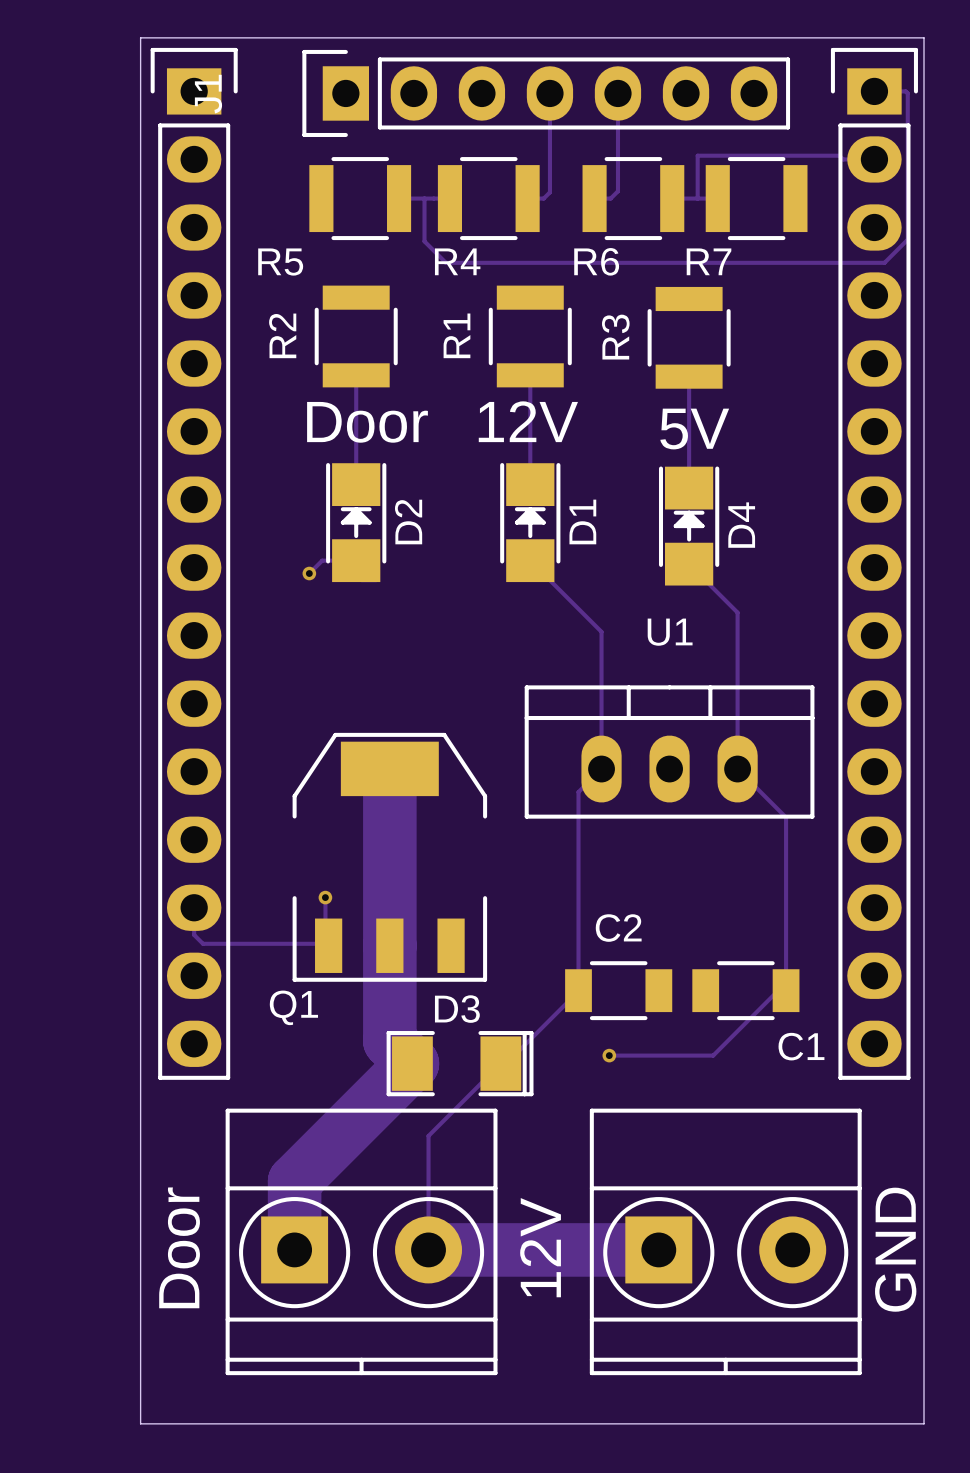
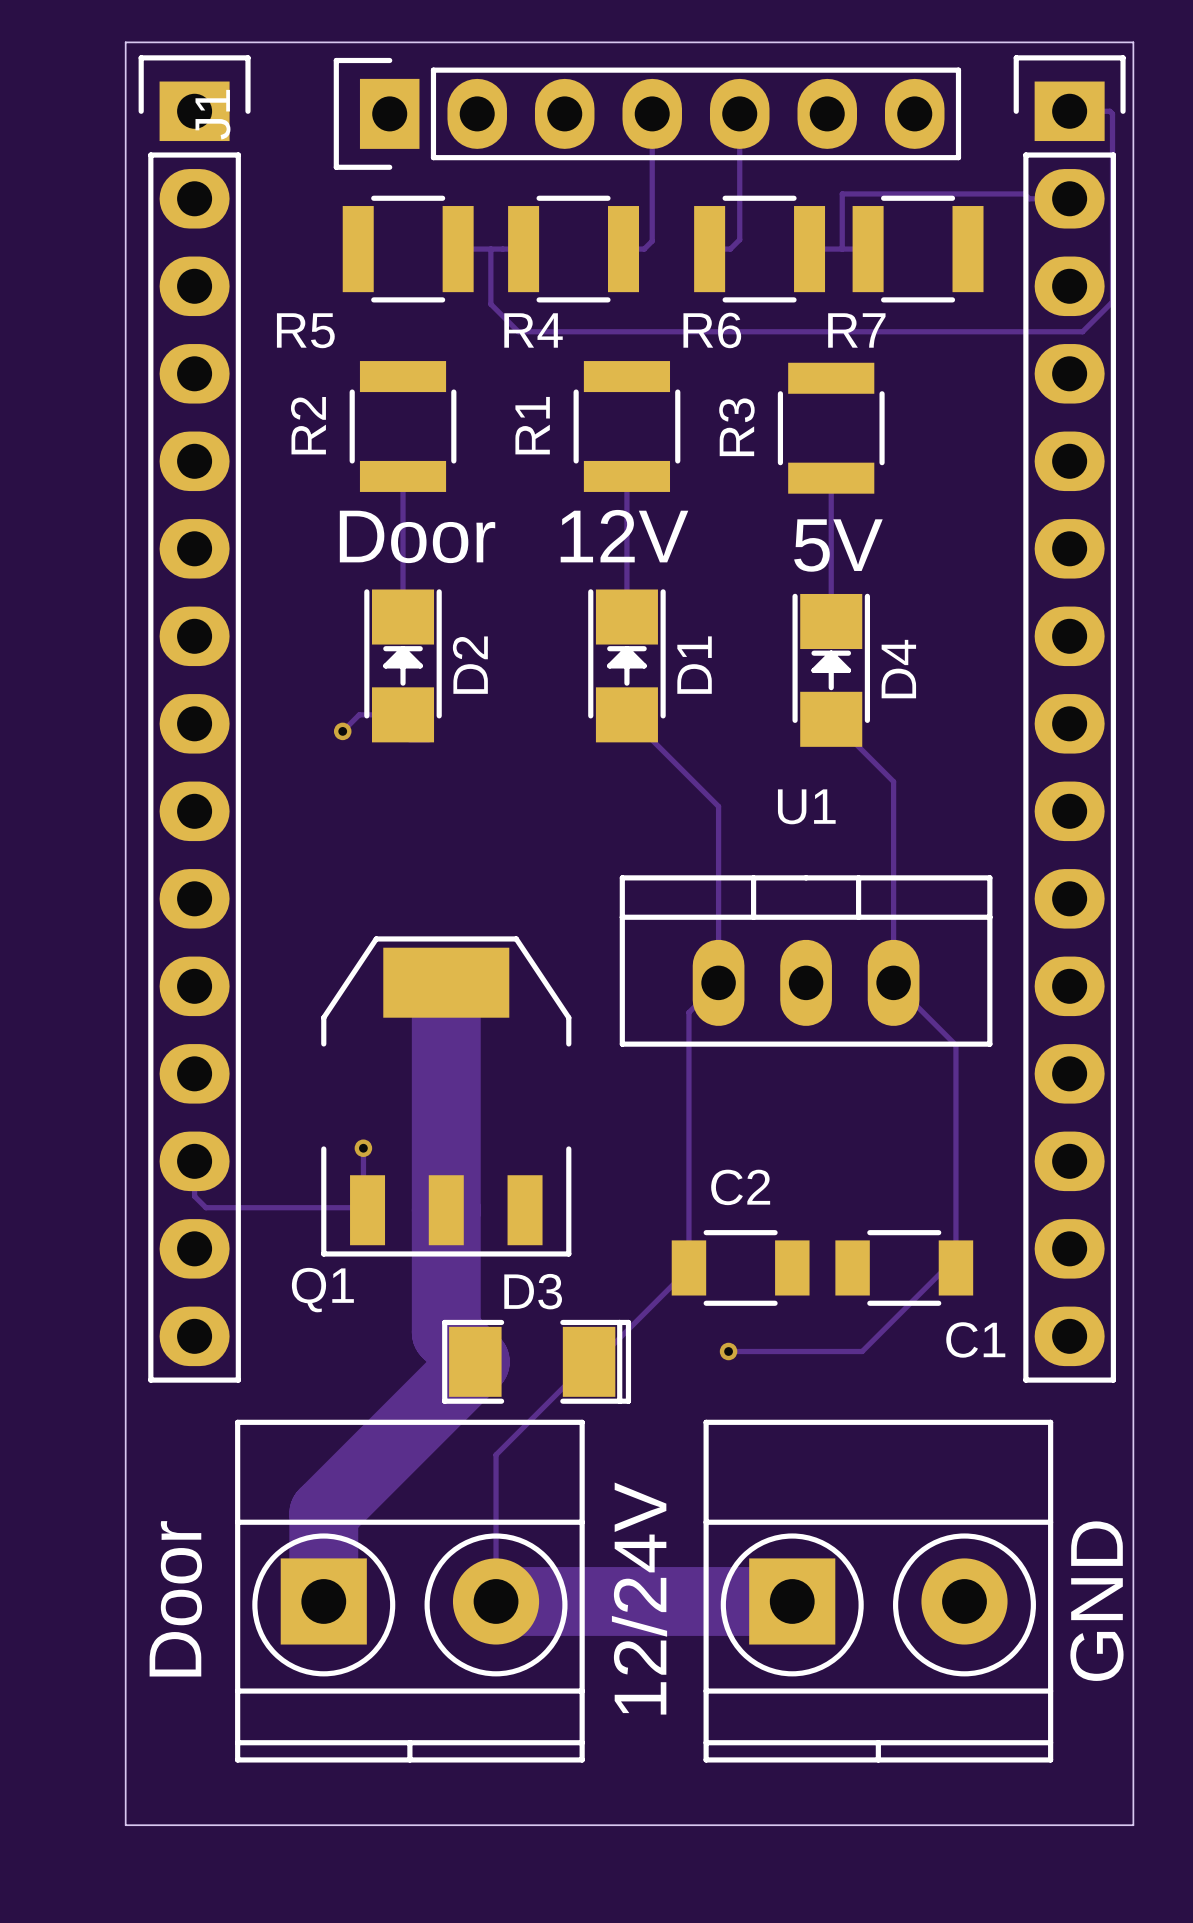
text: 12V (540, 1247) -> 12/24V (639, 1598)

